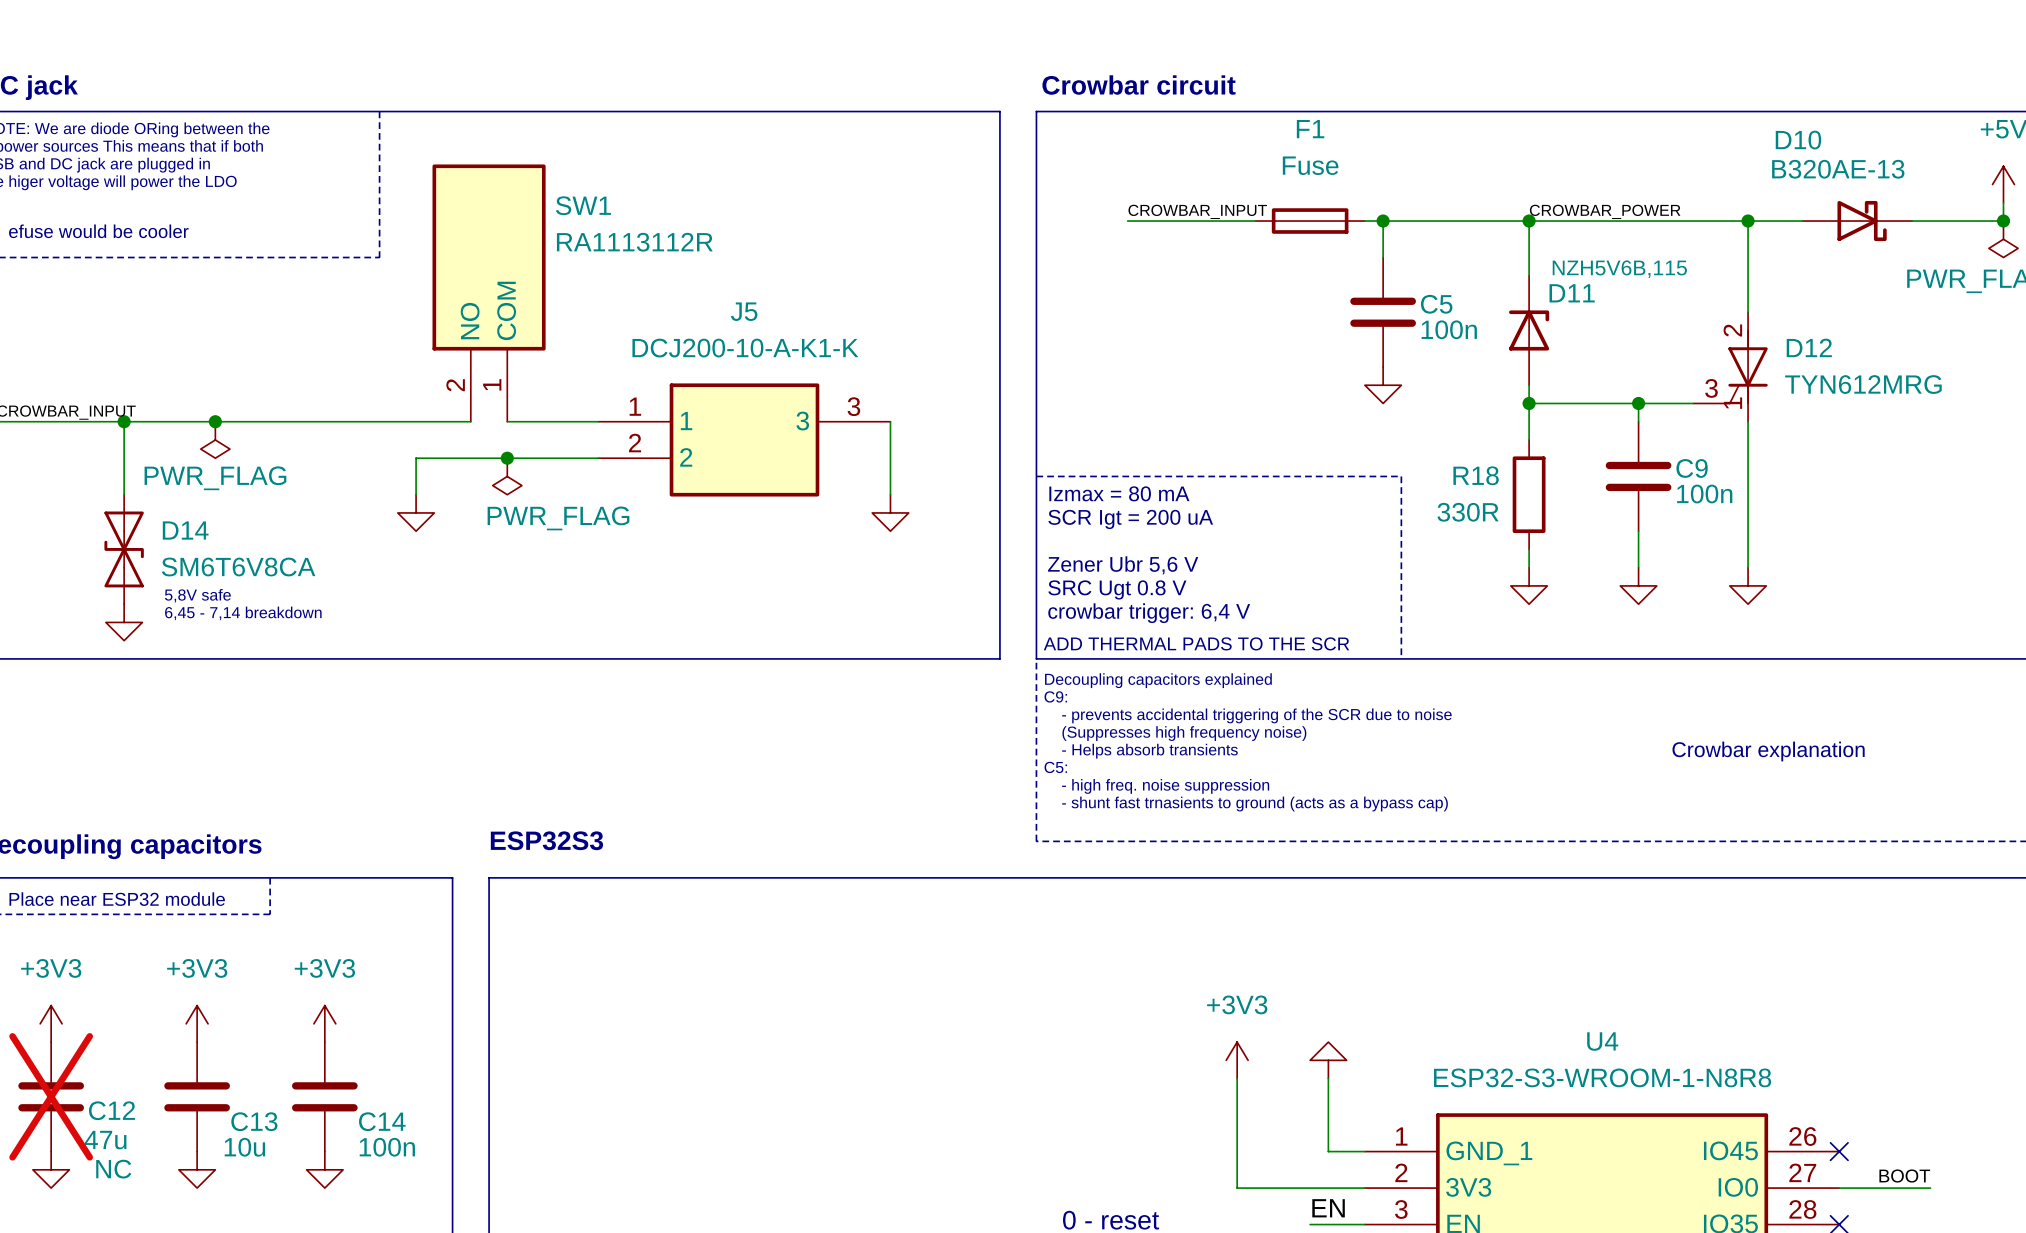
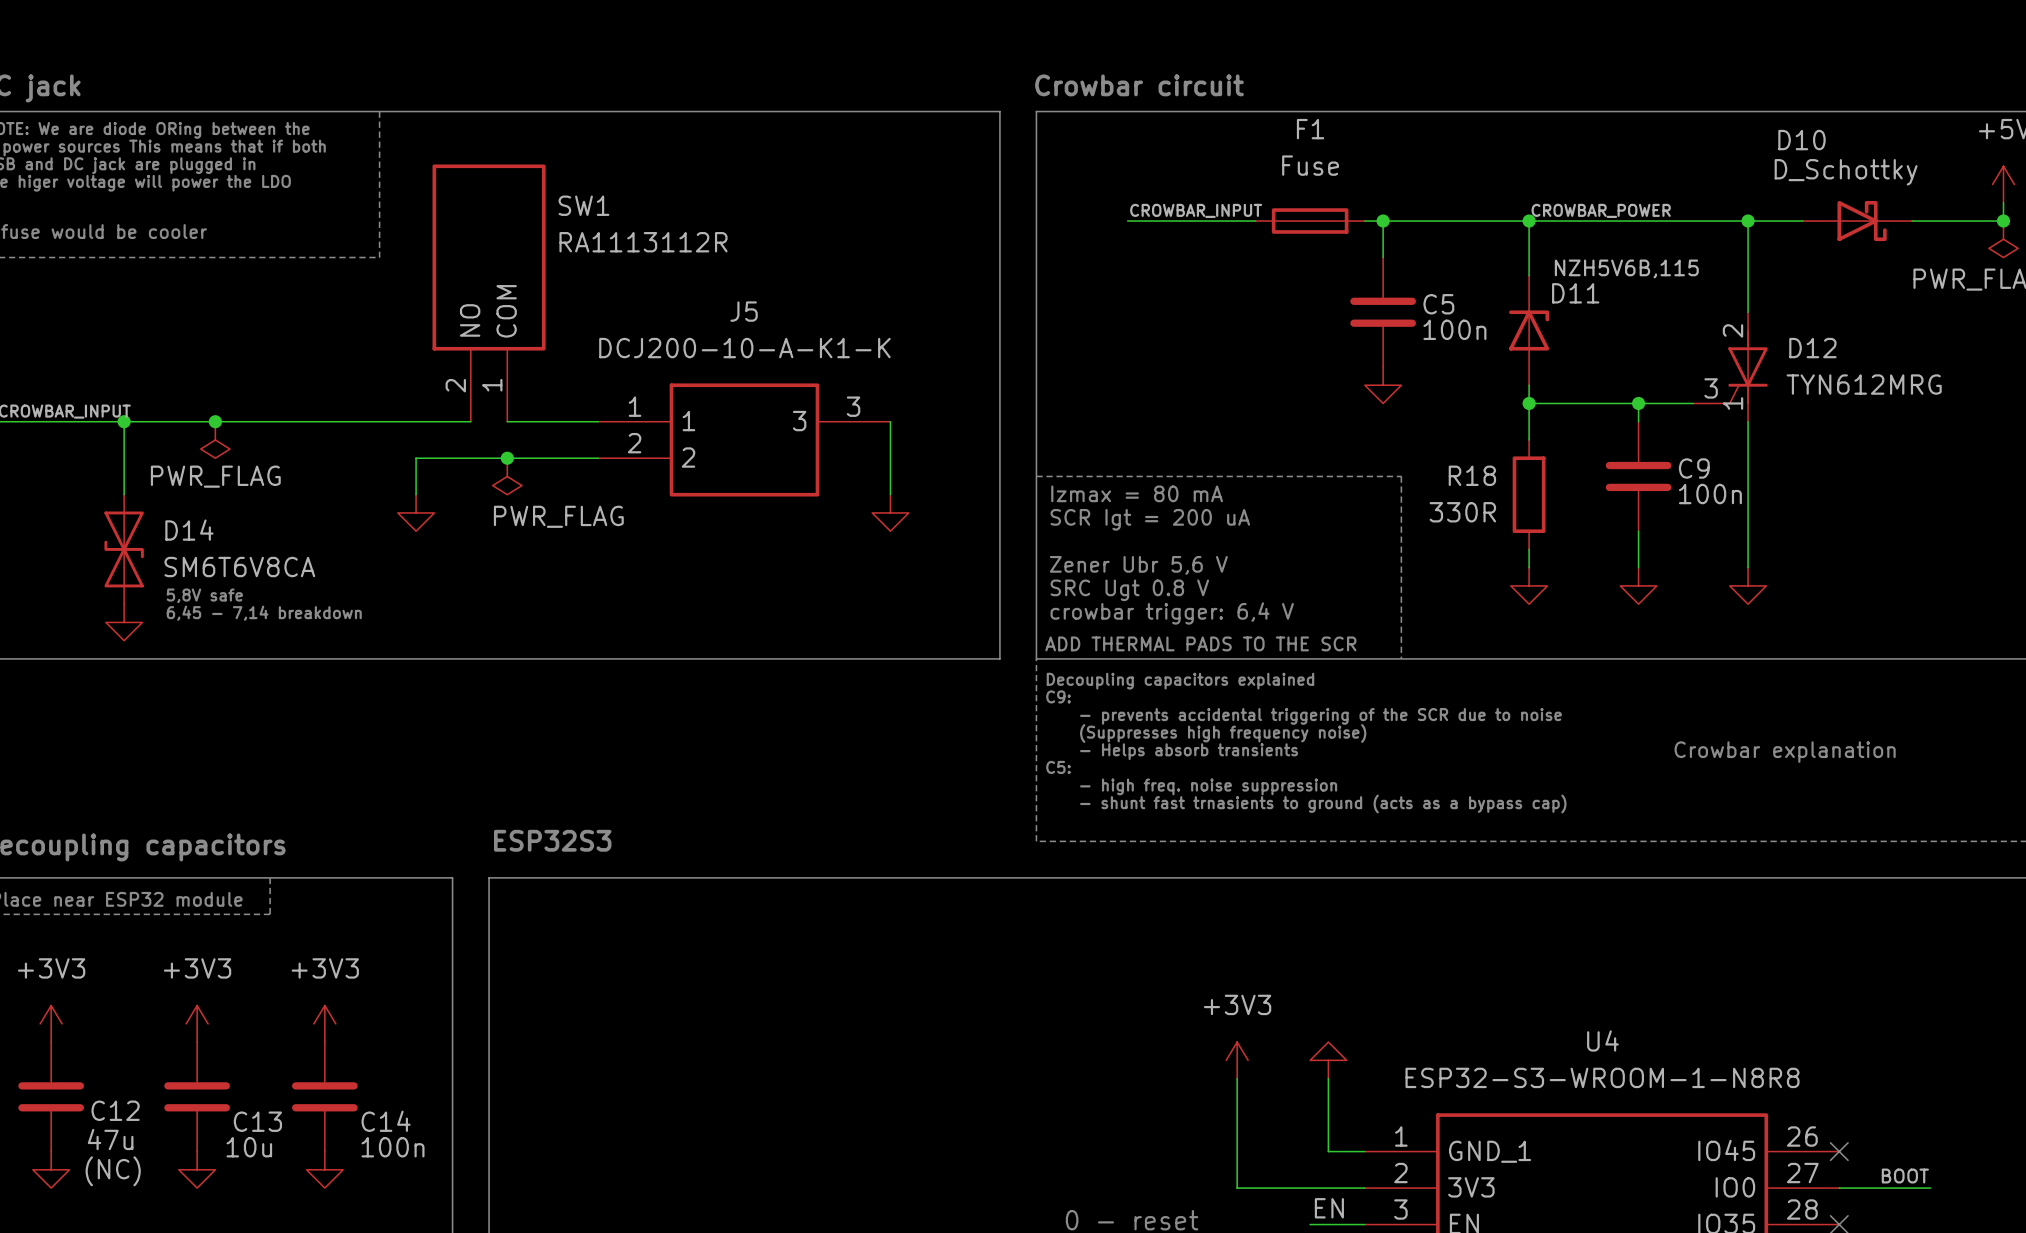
D10 value: B320AE-13 (1838, 169) -> D_Schottky (1846, 172)
C12 do-not-place cross: (51, 1096) -> none
C12 text: NC (113, 1169) -> (NC) (113, 1171)

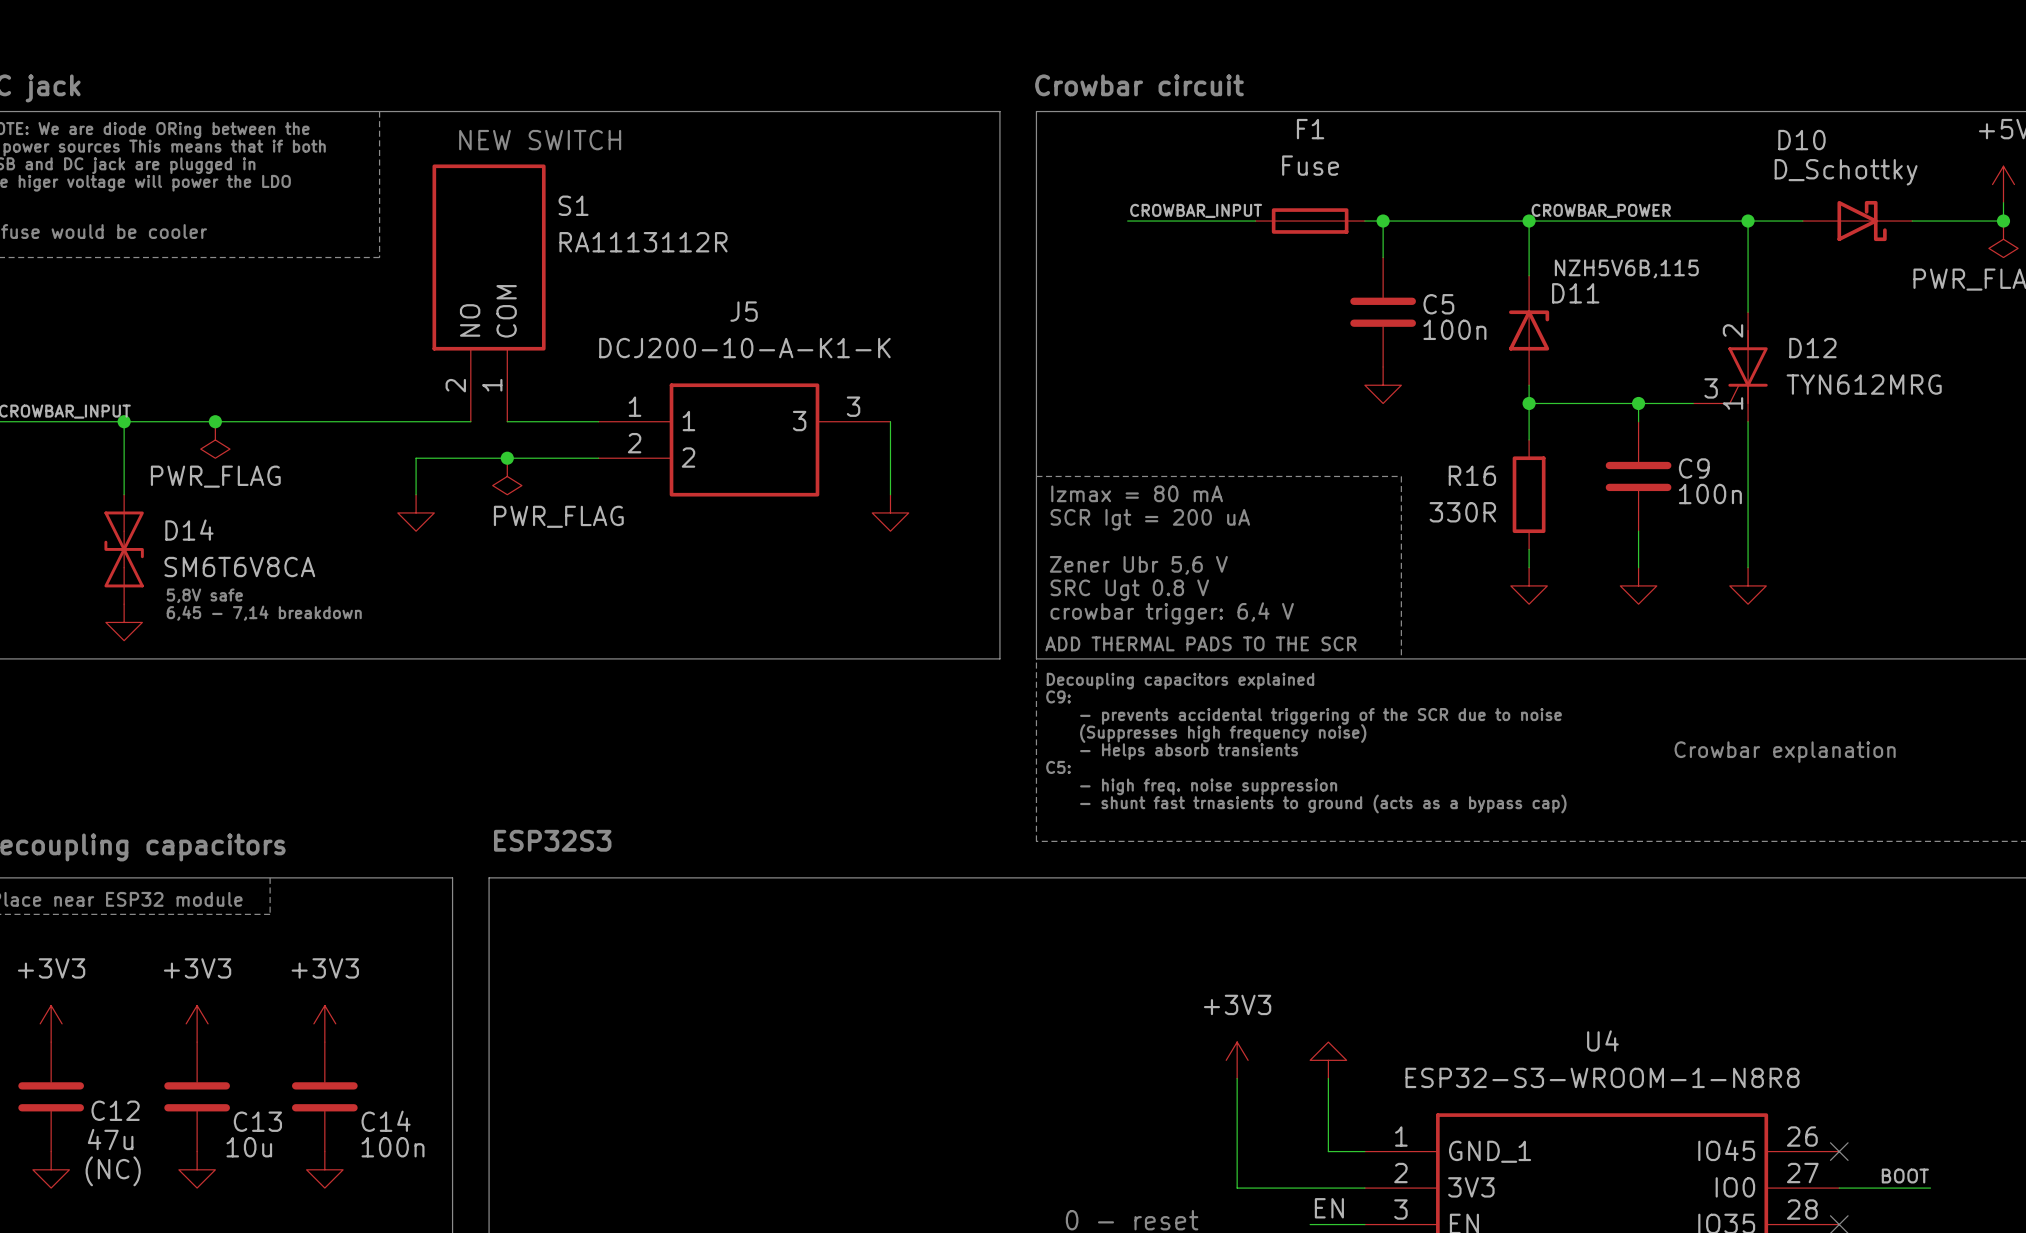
text: none -> NEW SWITCH (540, 140)
SW1 name: SW1 (583, 205) -> S1 (573, 205)
R18 name: R18 (1472, 475) -> R16 (1472, 475)

